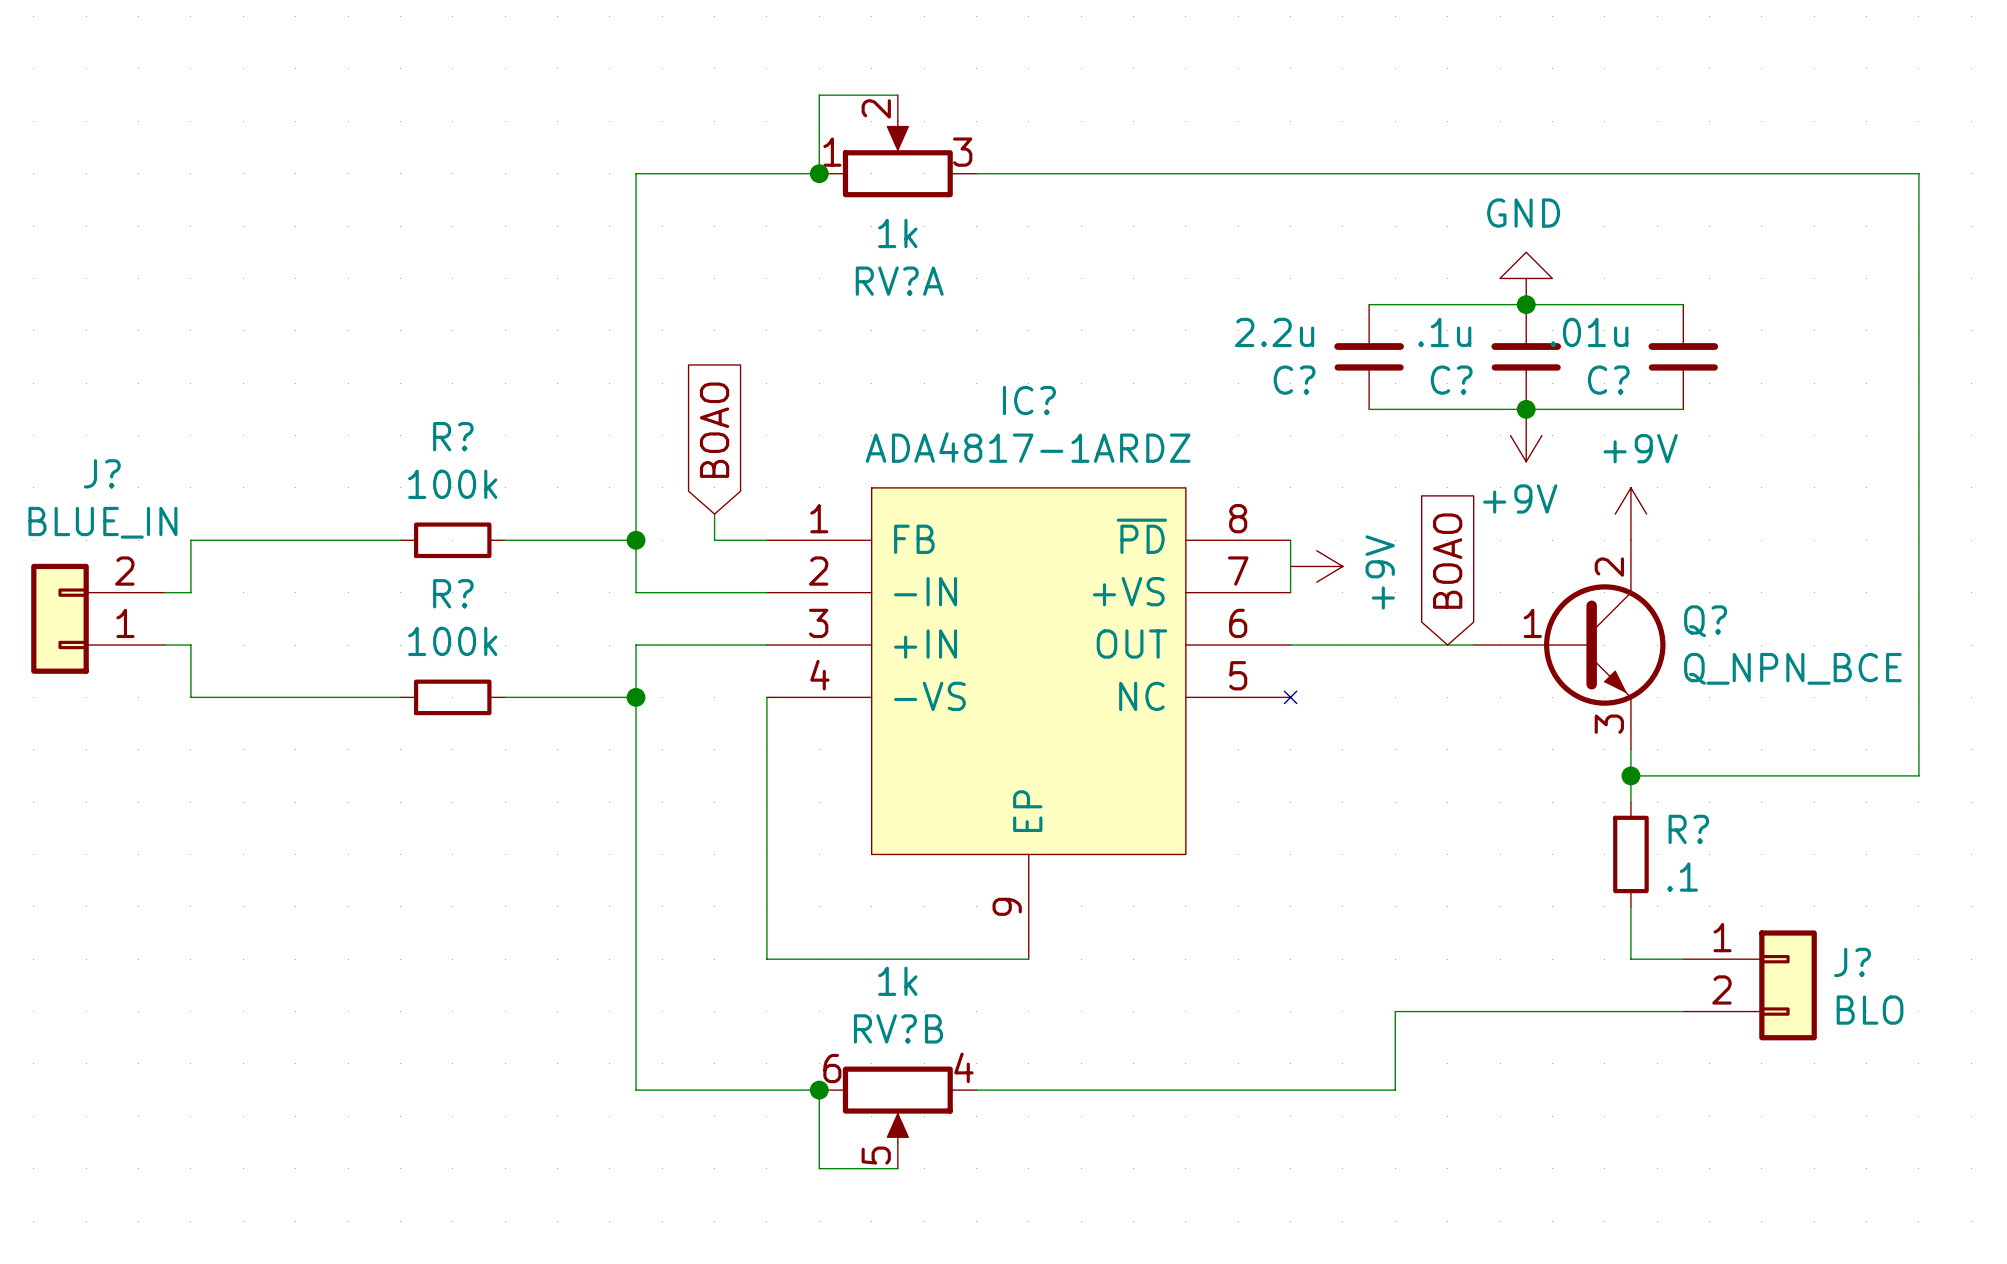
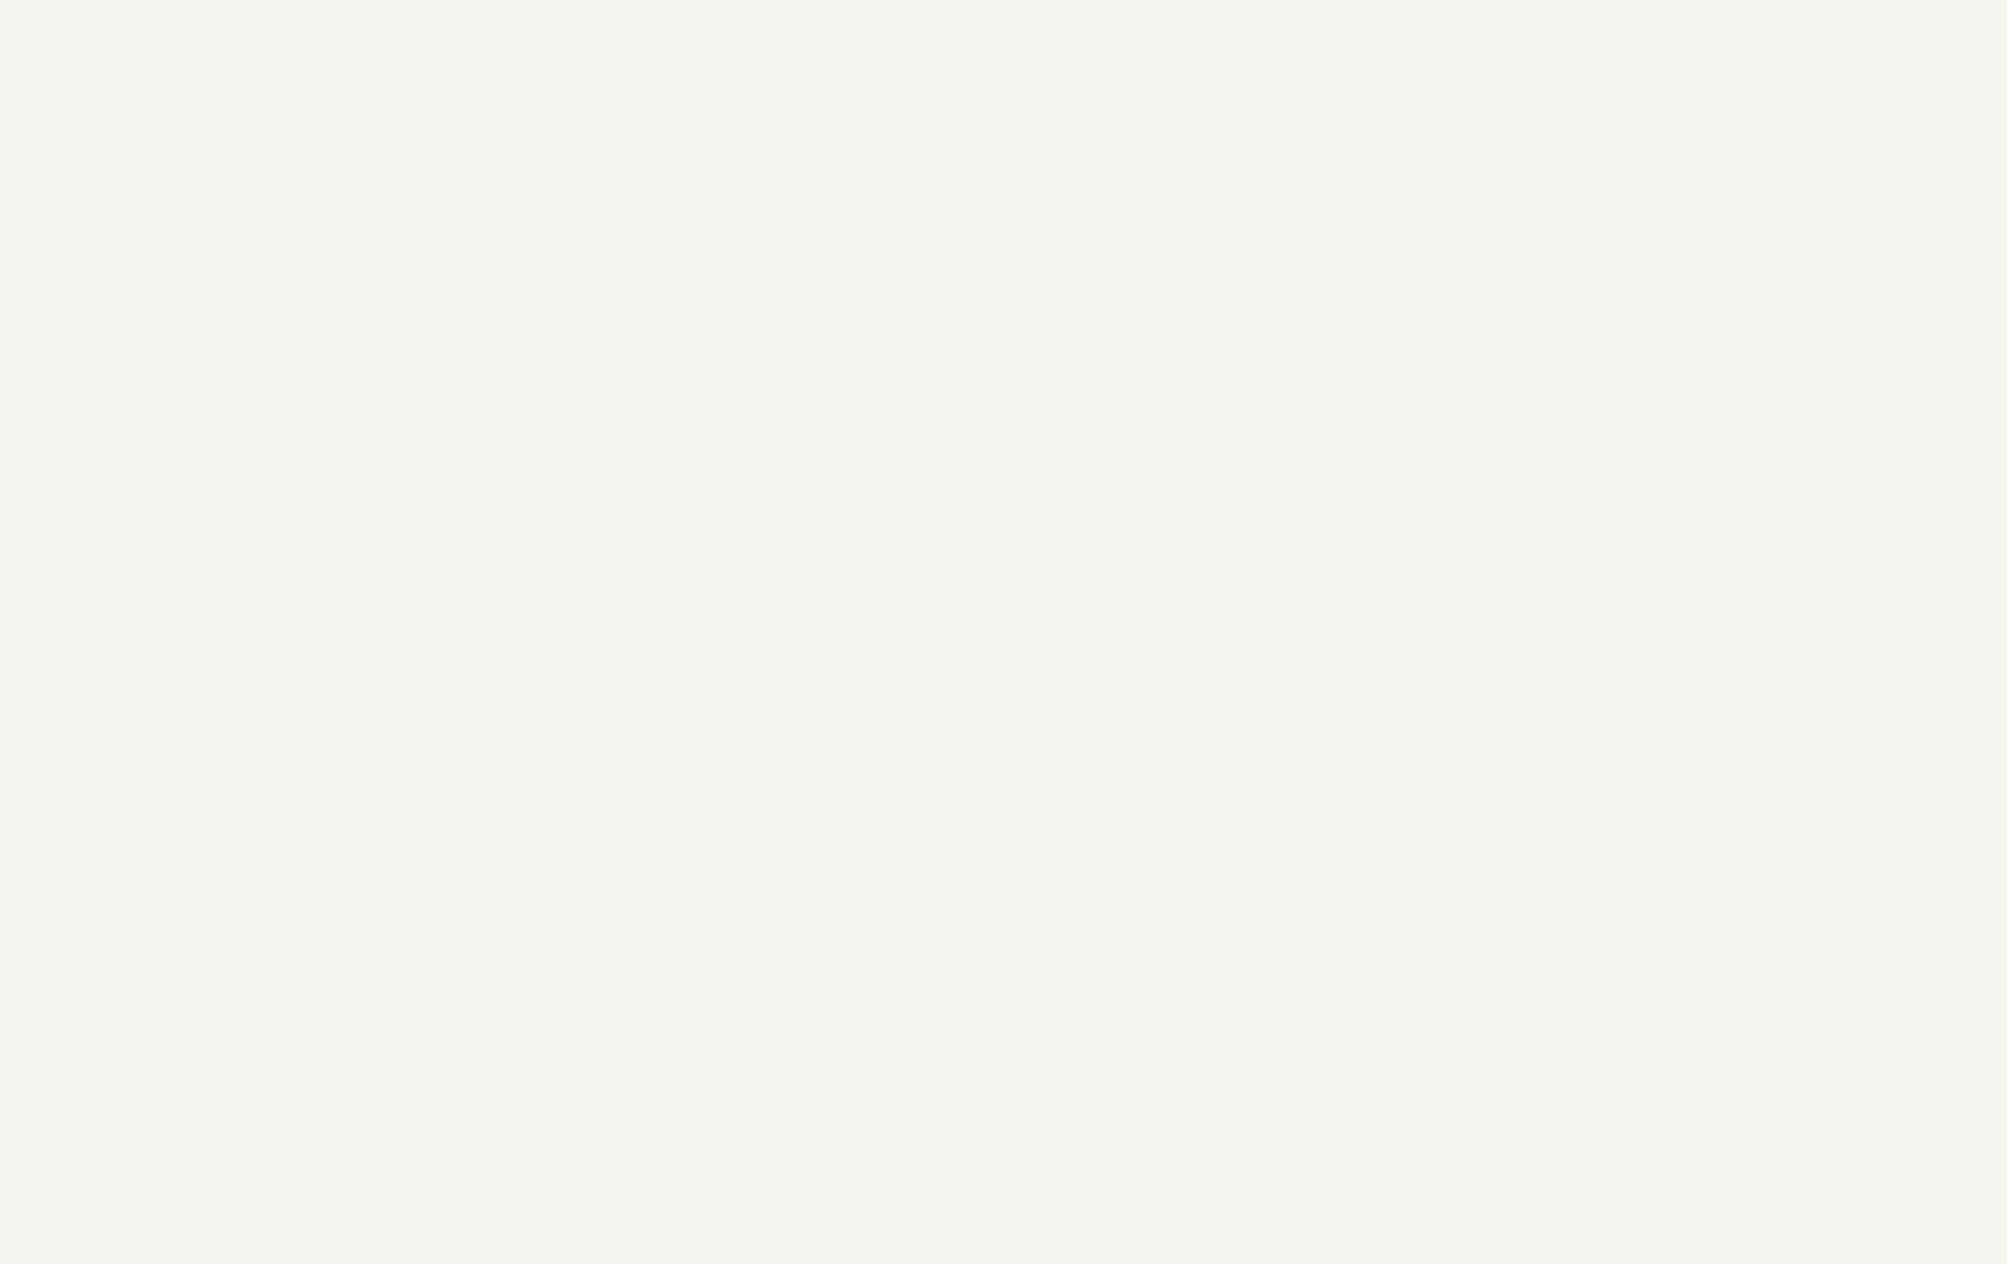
wire: (897, 95) (819, 95) (819, 173) (636, 173) (636, 592) (766, 592) -> none
RV?A: 1k (897, 146) -> none
junction: (819, 173) -> none
wire: (976, 173) (1918, 173) (1918, 775) (1630, 775) -> none
power symbol: GND (1526, 278) -> none
wire: (1369, 304) (1683, 304) -> none
junction: (1526, 304) -> none
C?: 2.2u (1369, 357) -> none
C?: .1u (1526, 357) -> none
C?: .01u (1683, 357) -> none
wire: (1369, 409) (1683, 409) -> none
junction: (1526, 409) -> none
global label: BOAO (714, 430) -> none
power symbol: +9V (1526, 435) -> none
wire: (714, 514) (714, 540) (766, 540) -> none
power symbol: +9V (1630, 514) -> none
wire: (400, 540) (190, 540) (190, 592) (164, 592) -> none
R?: 100k (452, 540) -> none
wire: (505, 540) (636, 540) -> none
junction: (636, 540) -> none
wire: (1290, 540) (1290, 592) -> none
global label: BOAO (1447, 561) -> none
power symbol: +9V (1316, 566) -> none
J?: BLUE_IN (97, 618) -> none
wire: (164, 645) (190, 645) (190, 697) (400, 697) -> none
wire: (766, 645) (636, 645) (636, 1090) (819, 1090) (819, 1168) (897, 1168) -> none
wire: (1290, 645) (1473, 645) -> none
Q?: Q_NPN_BCE (1569, 645) -> none
R?: 100k (452, 697) -> none
wire: (505, 697) (636, 697) -> none
junction: (636, 697) -> none
wire: (766, 697) (766, 959) (1028, 959) -> none
IC?: ADA4817-1ARDZ (1031, 723) -> none
wire: (1630, 749) (1630, 802) -> none
junction: (1630, 775) -> none
R?: .1 (1630, 854) -> none
wire: (1630, 906) (1630, 959) (1683, 959) -> none
J?: BLO (1750, 985) -> none
wire: (1683, 1011) (1395, 1011) (1395, 1090) (976, 1090) -> none
junction: (819, 1090) -> none
RV?B: 1k (897, 1117) -> none

